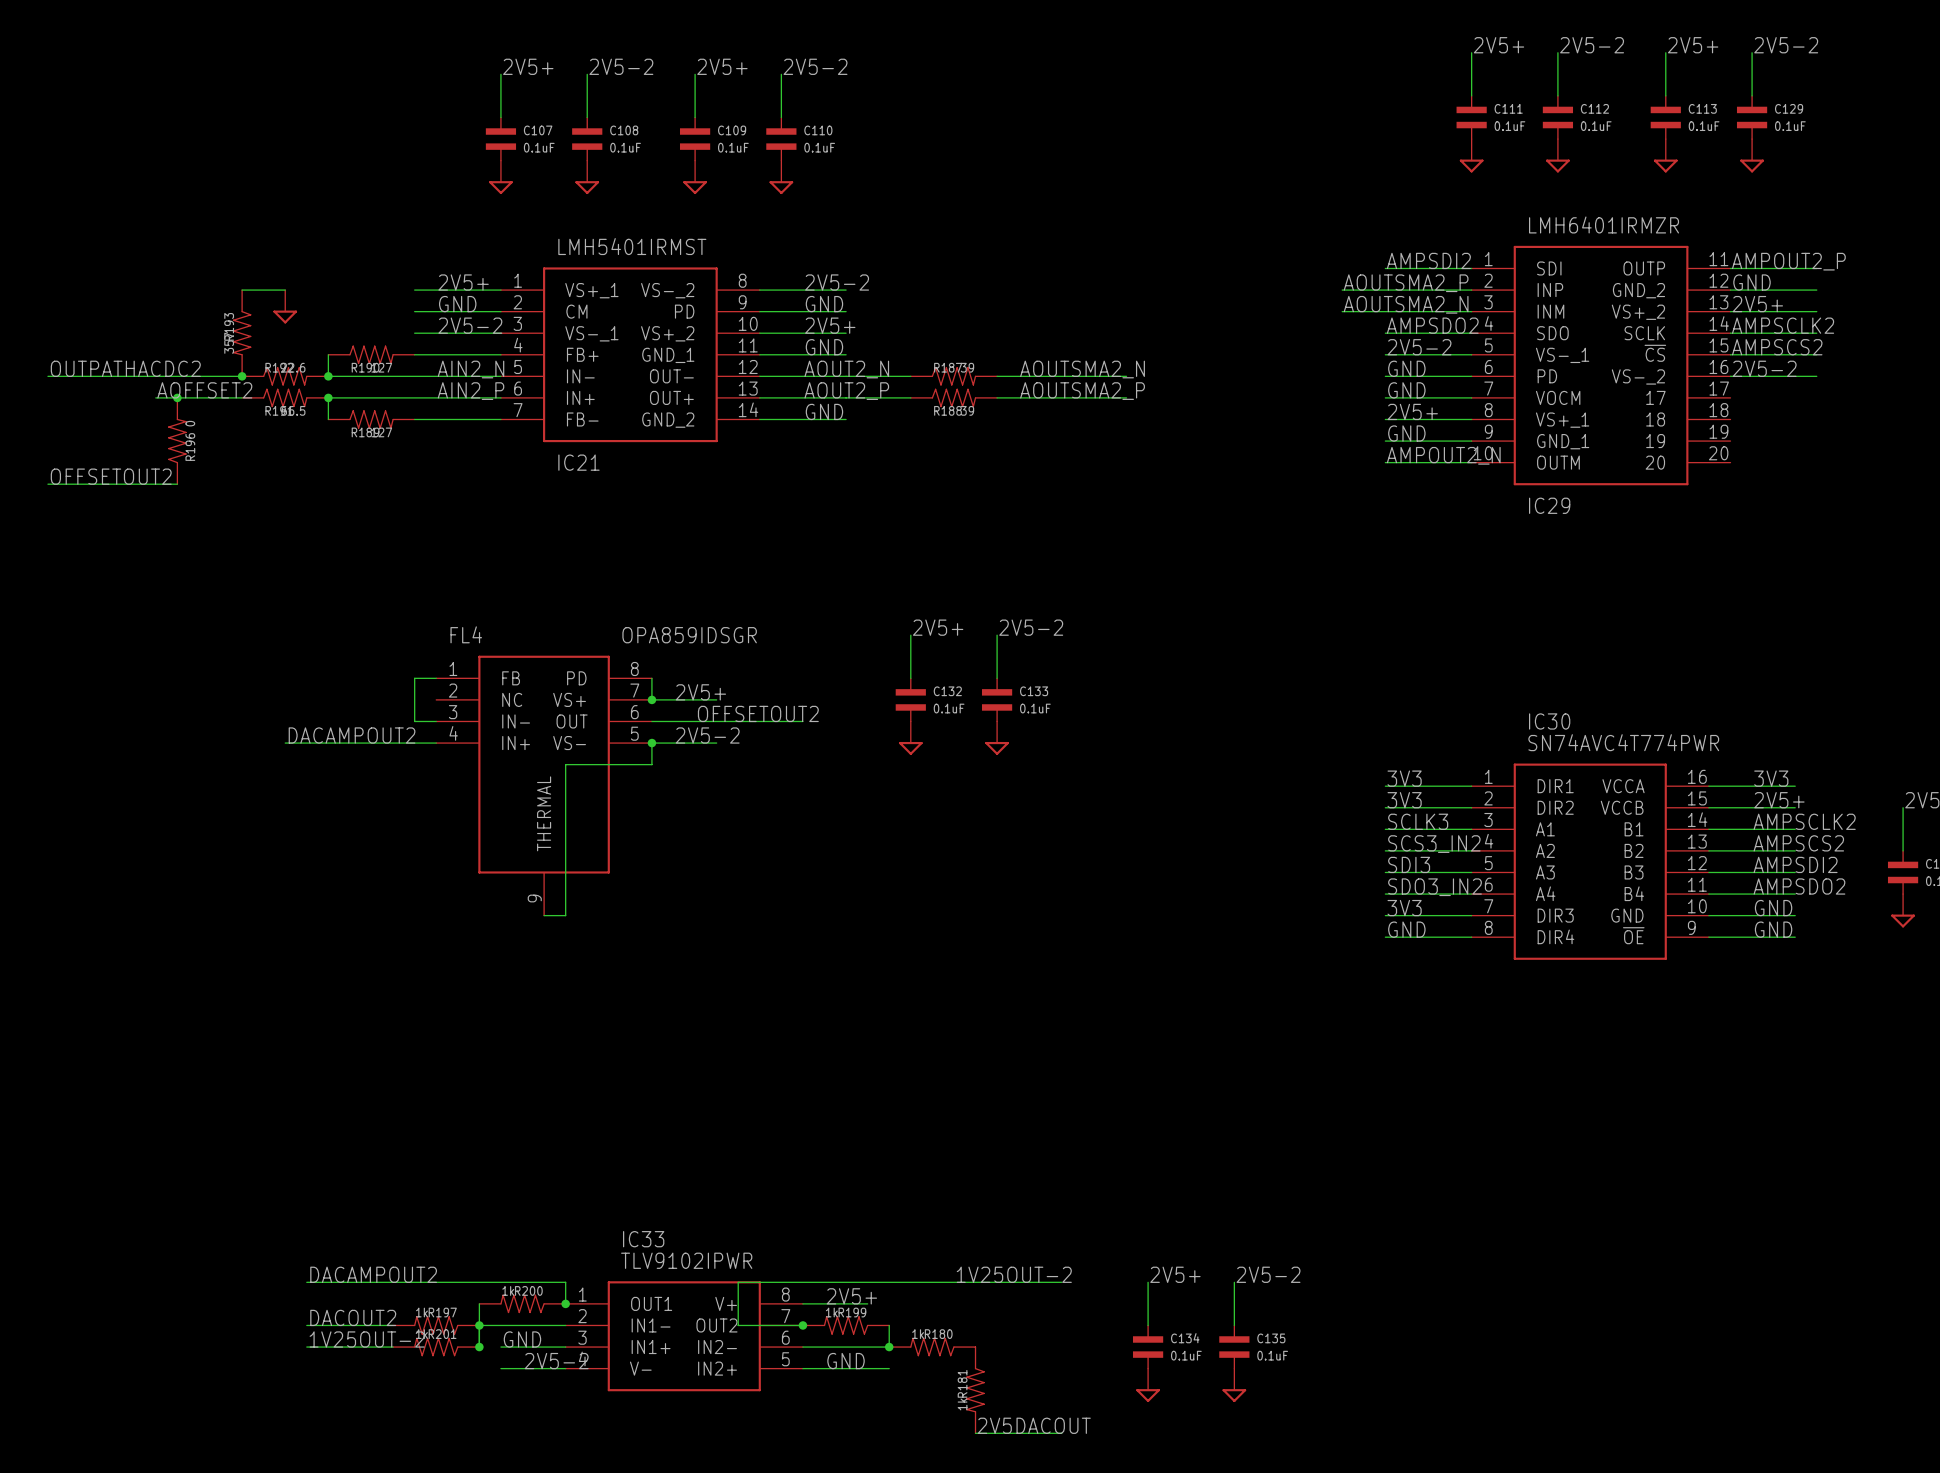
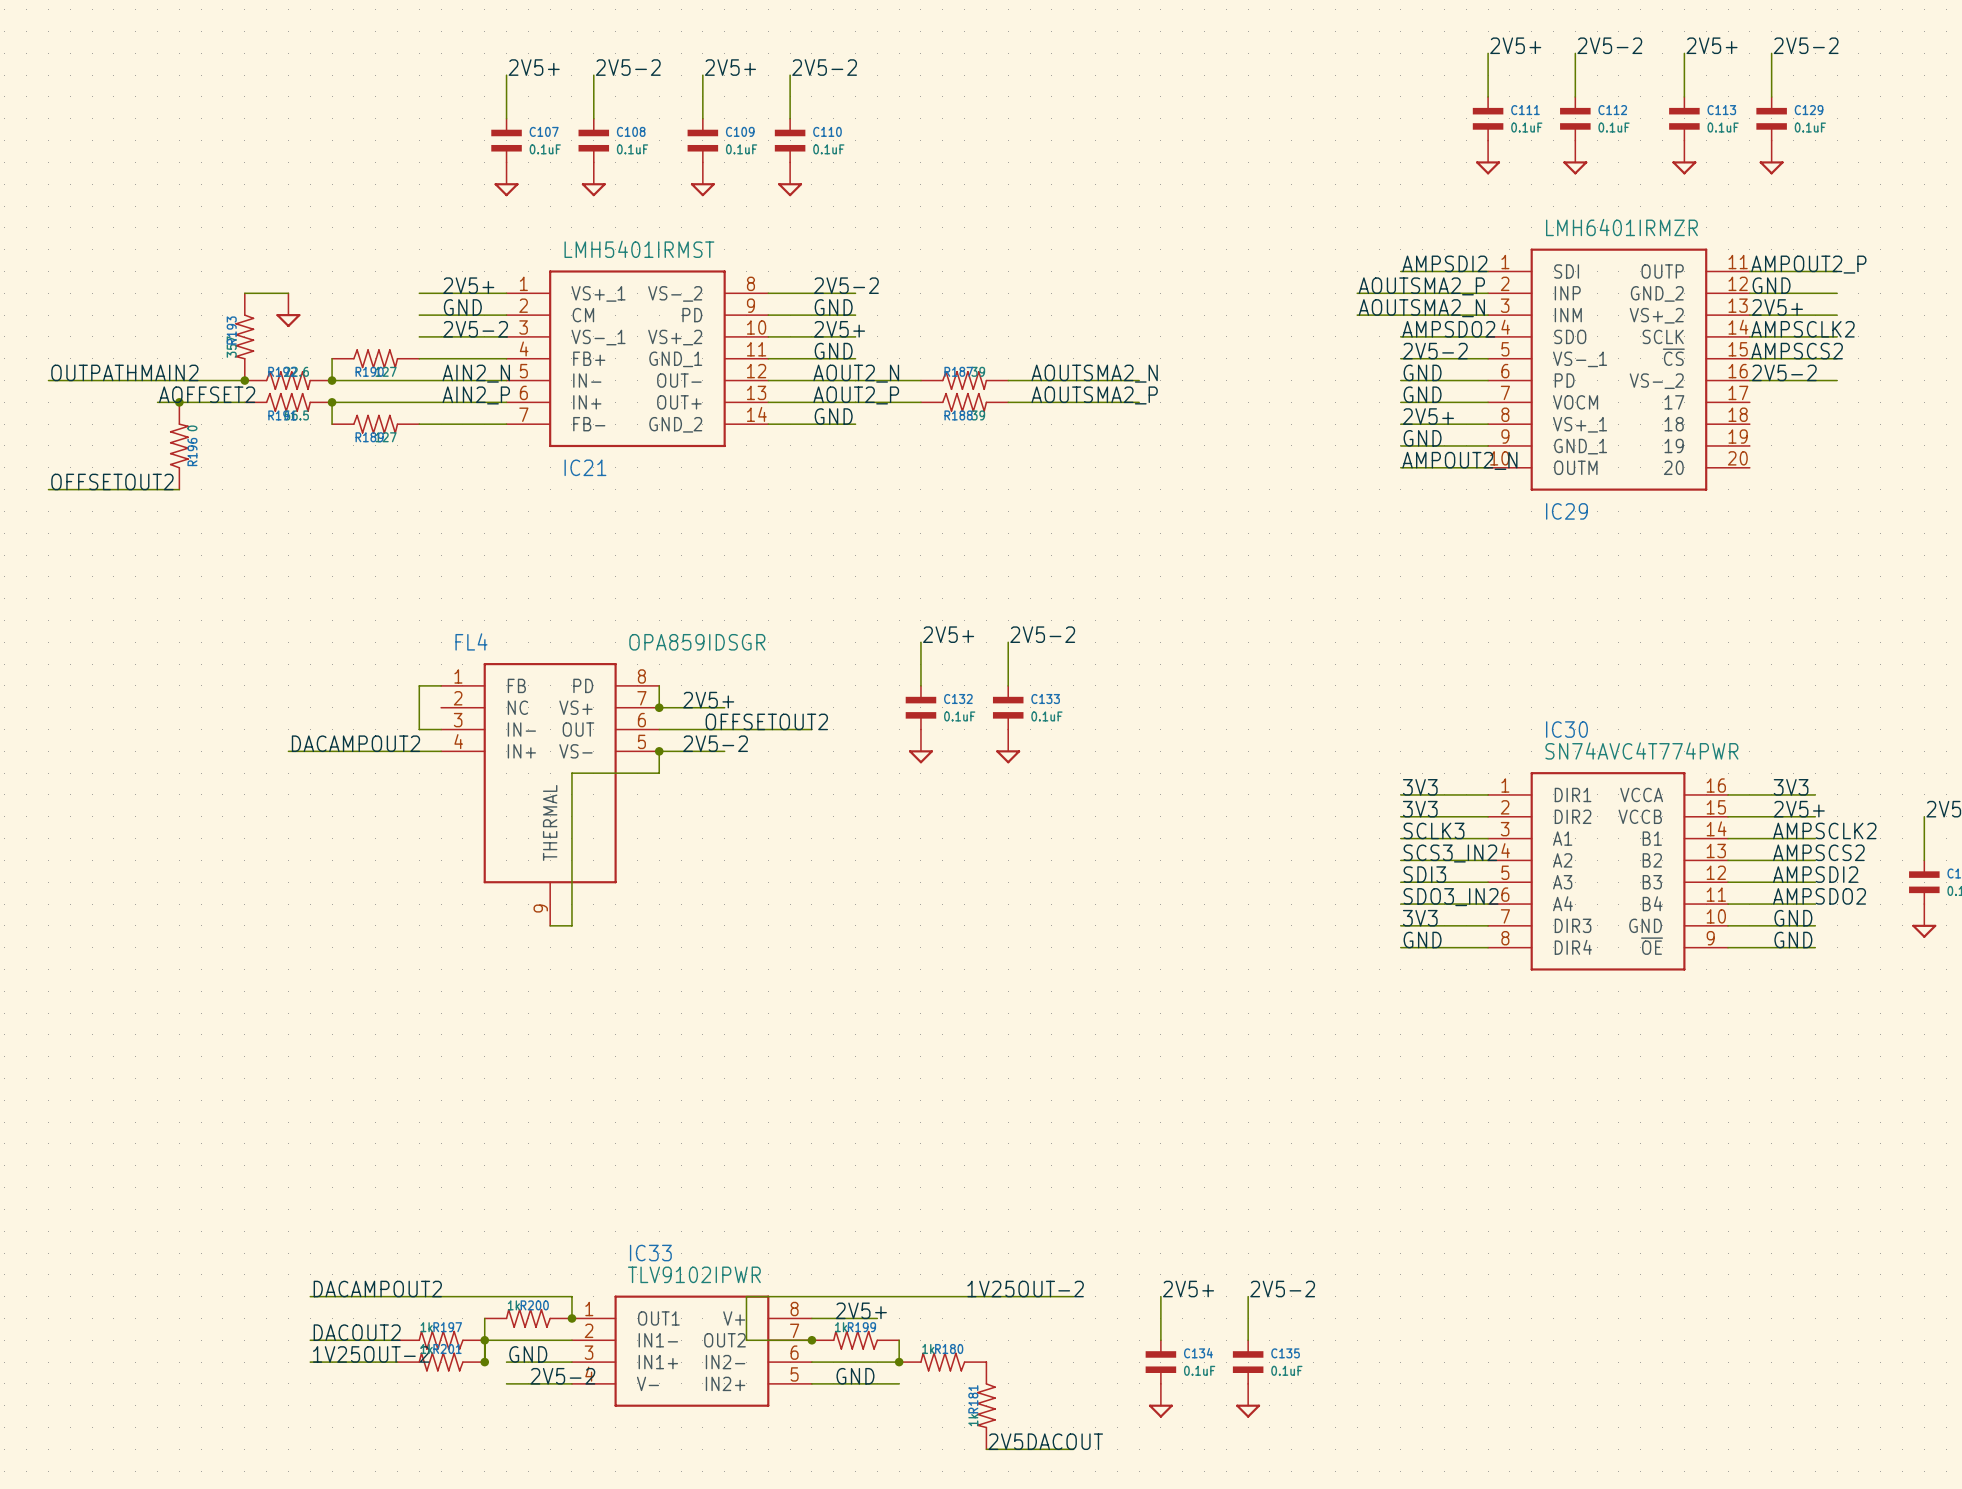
label: OUTPATHACDC2 (125, 368) -> OUTPATHMAIN2 (124, 372)

